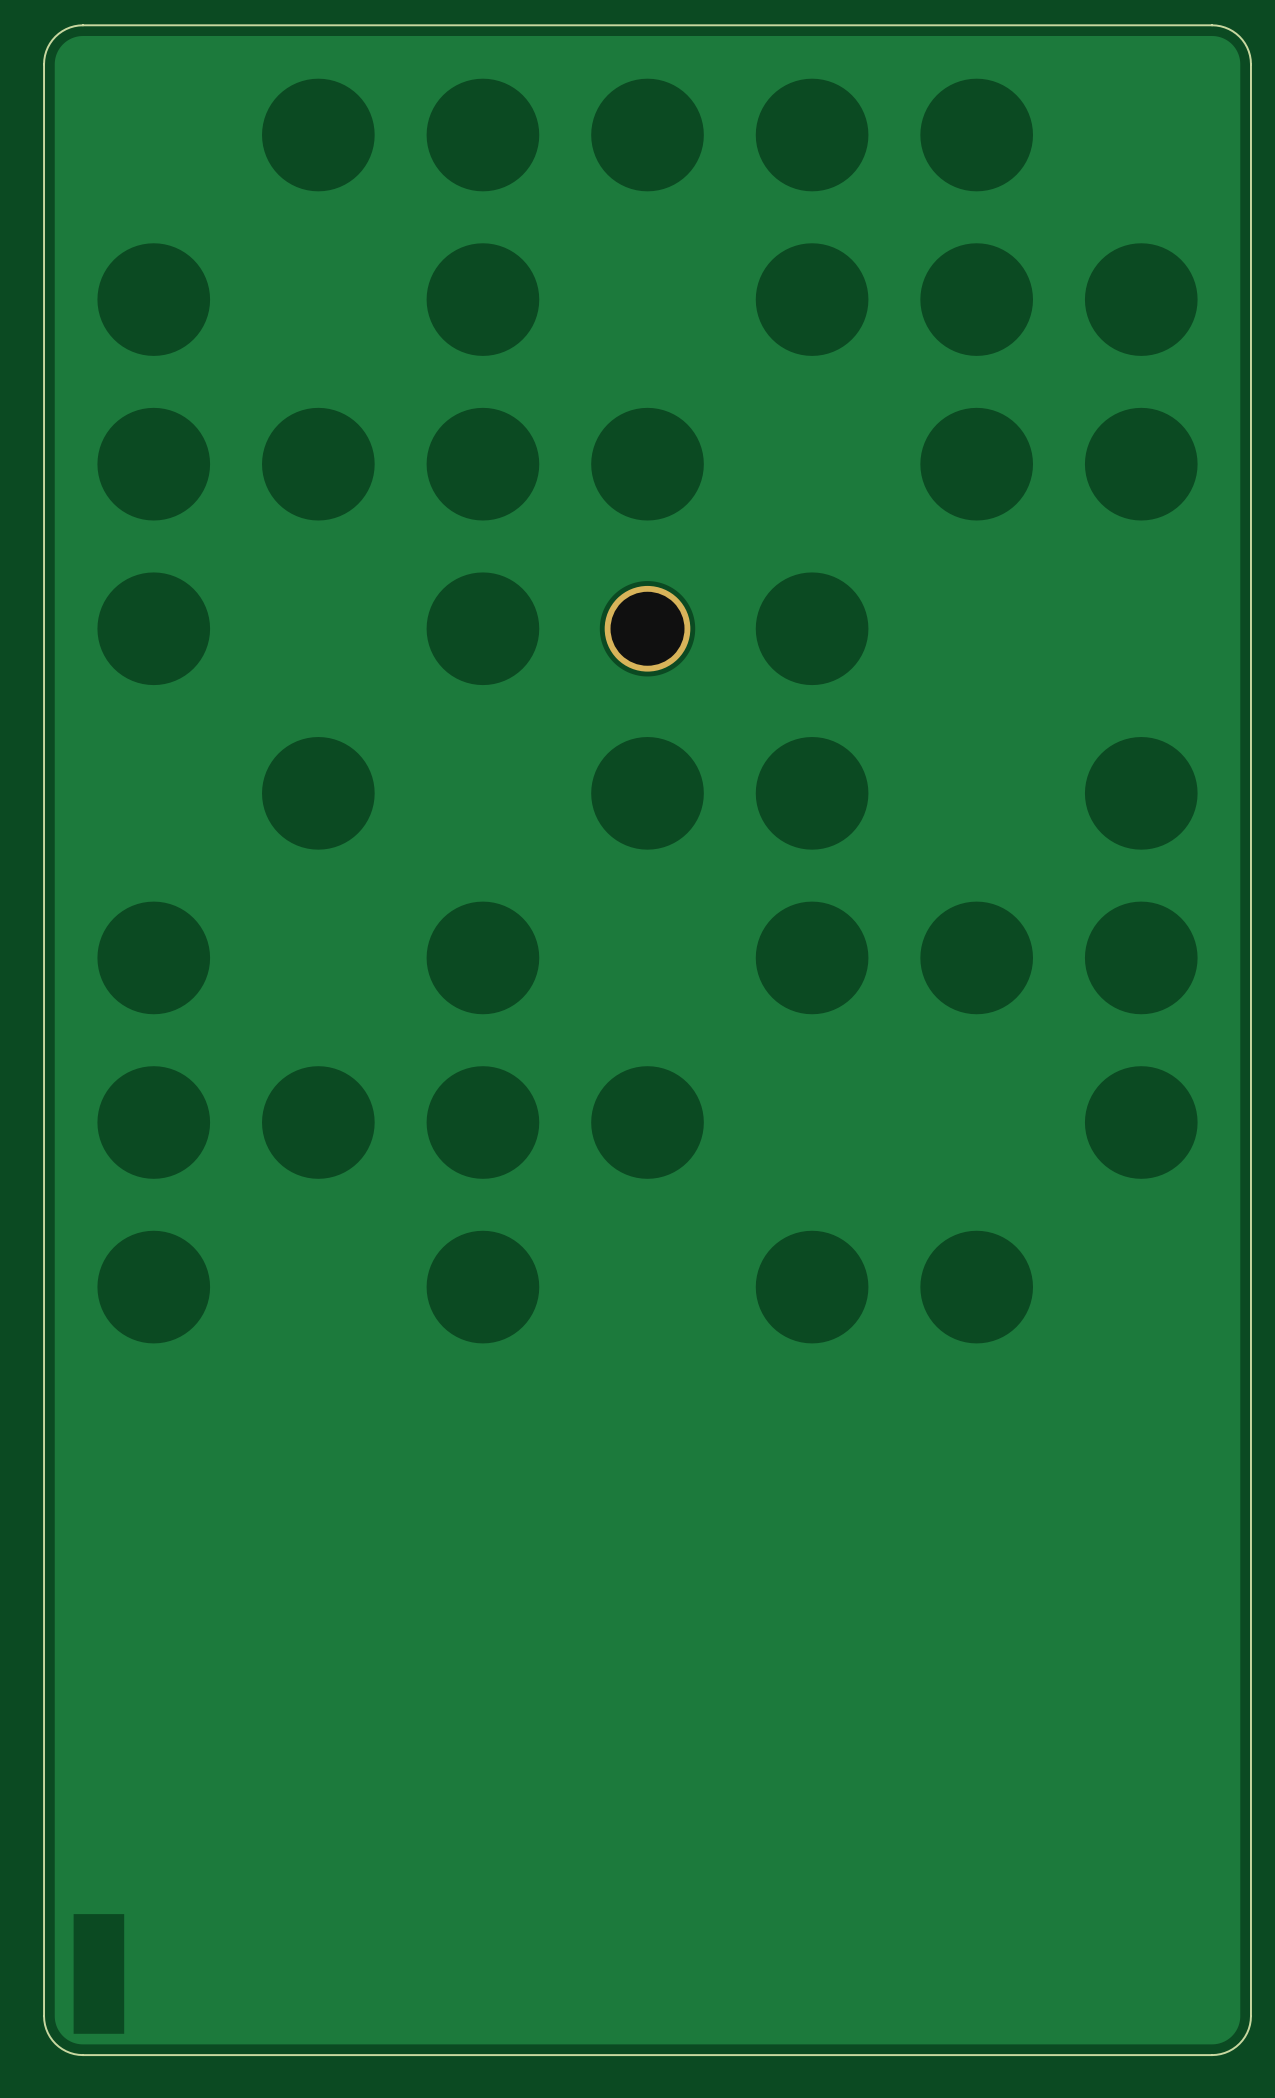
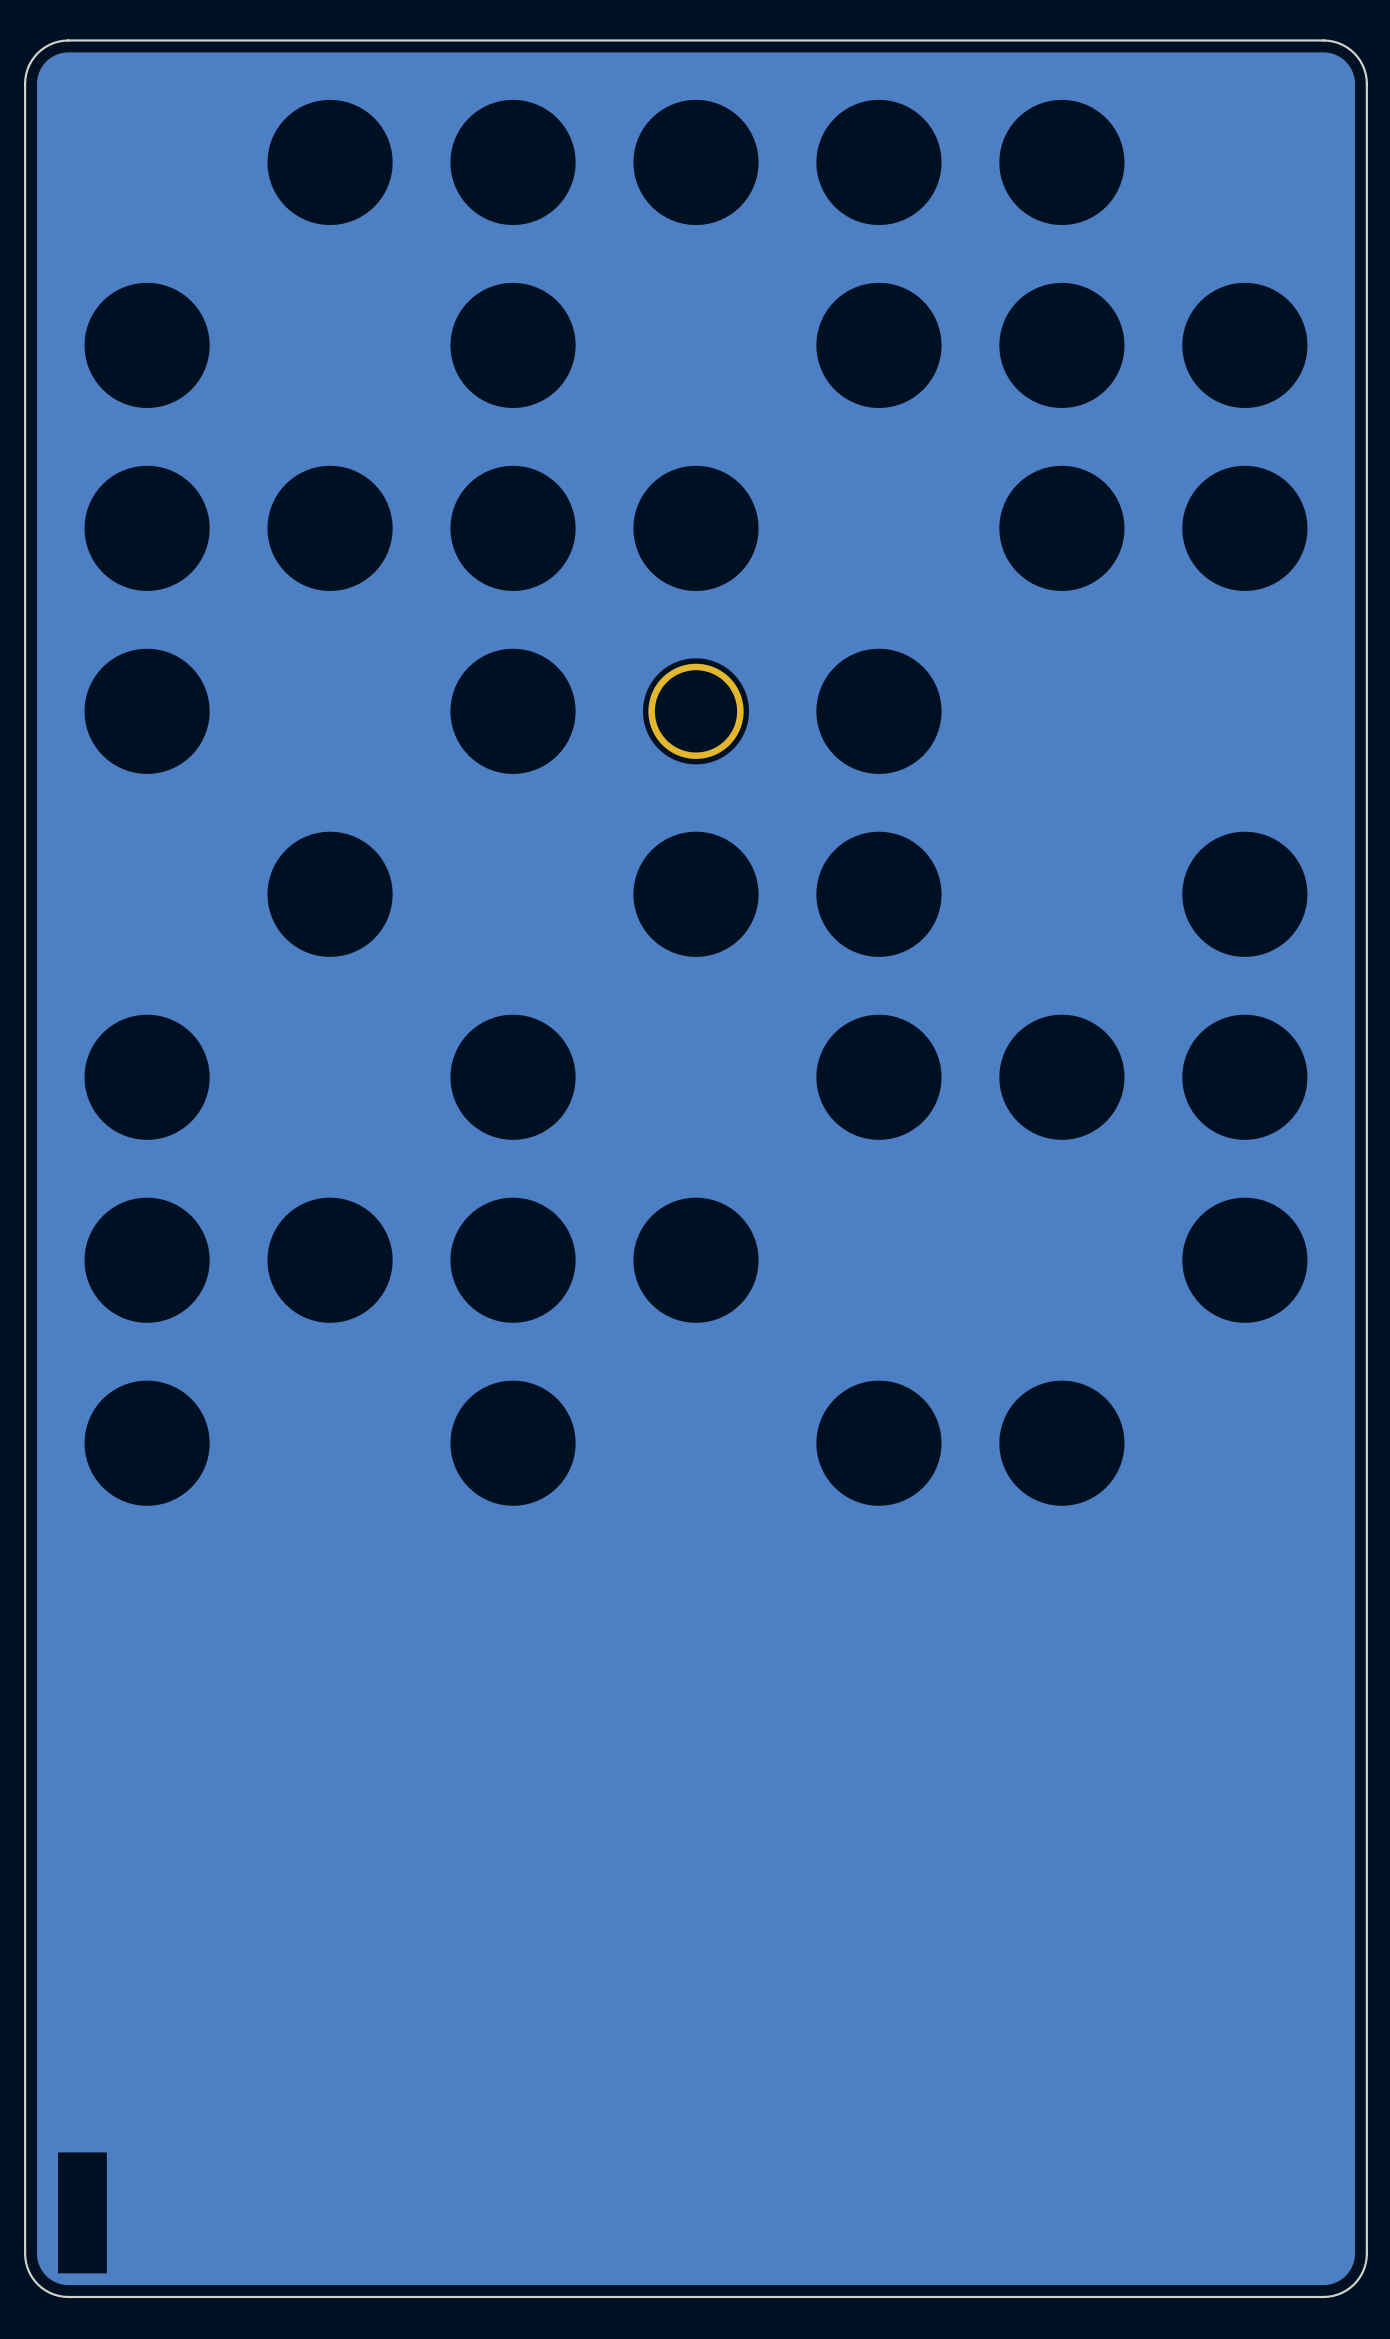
drawing shape: [54, 36, 1241, 2045] -> [37, 52, 1355, 2286]

